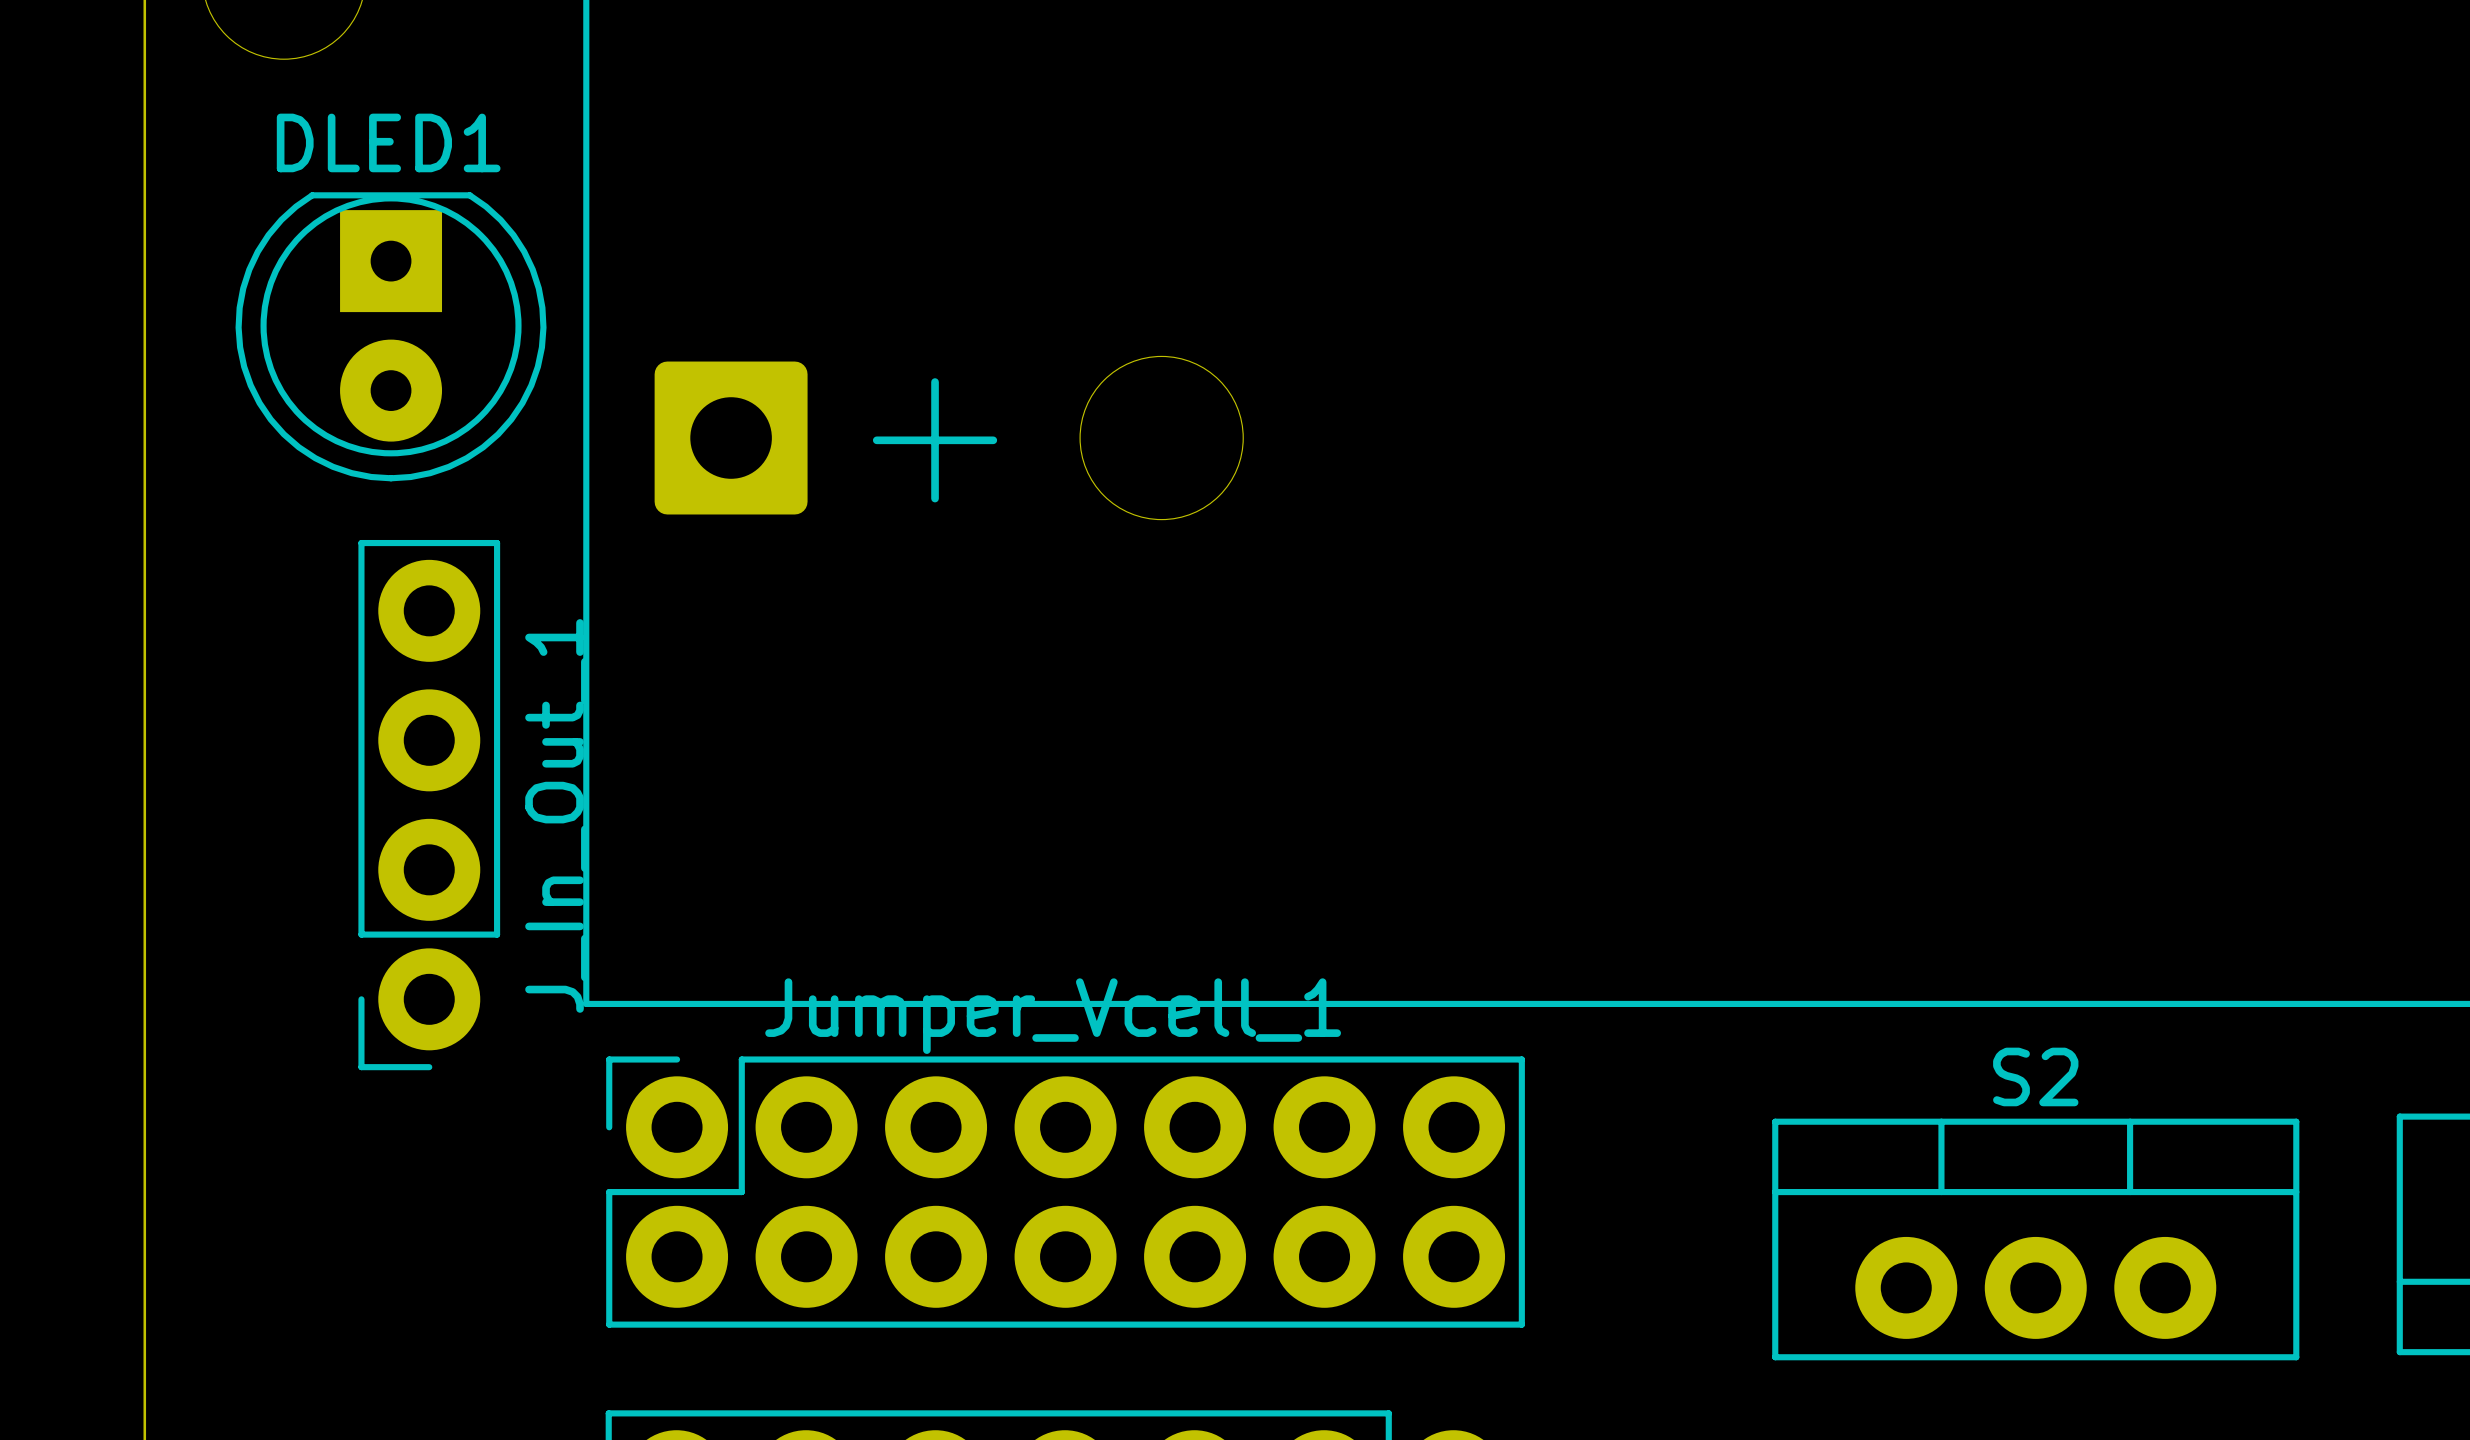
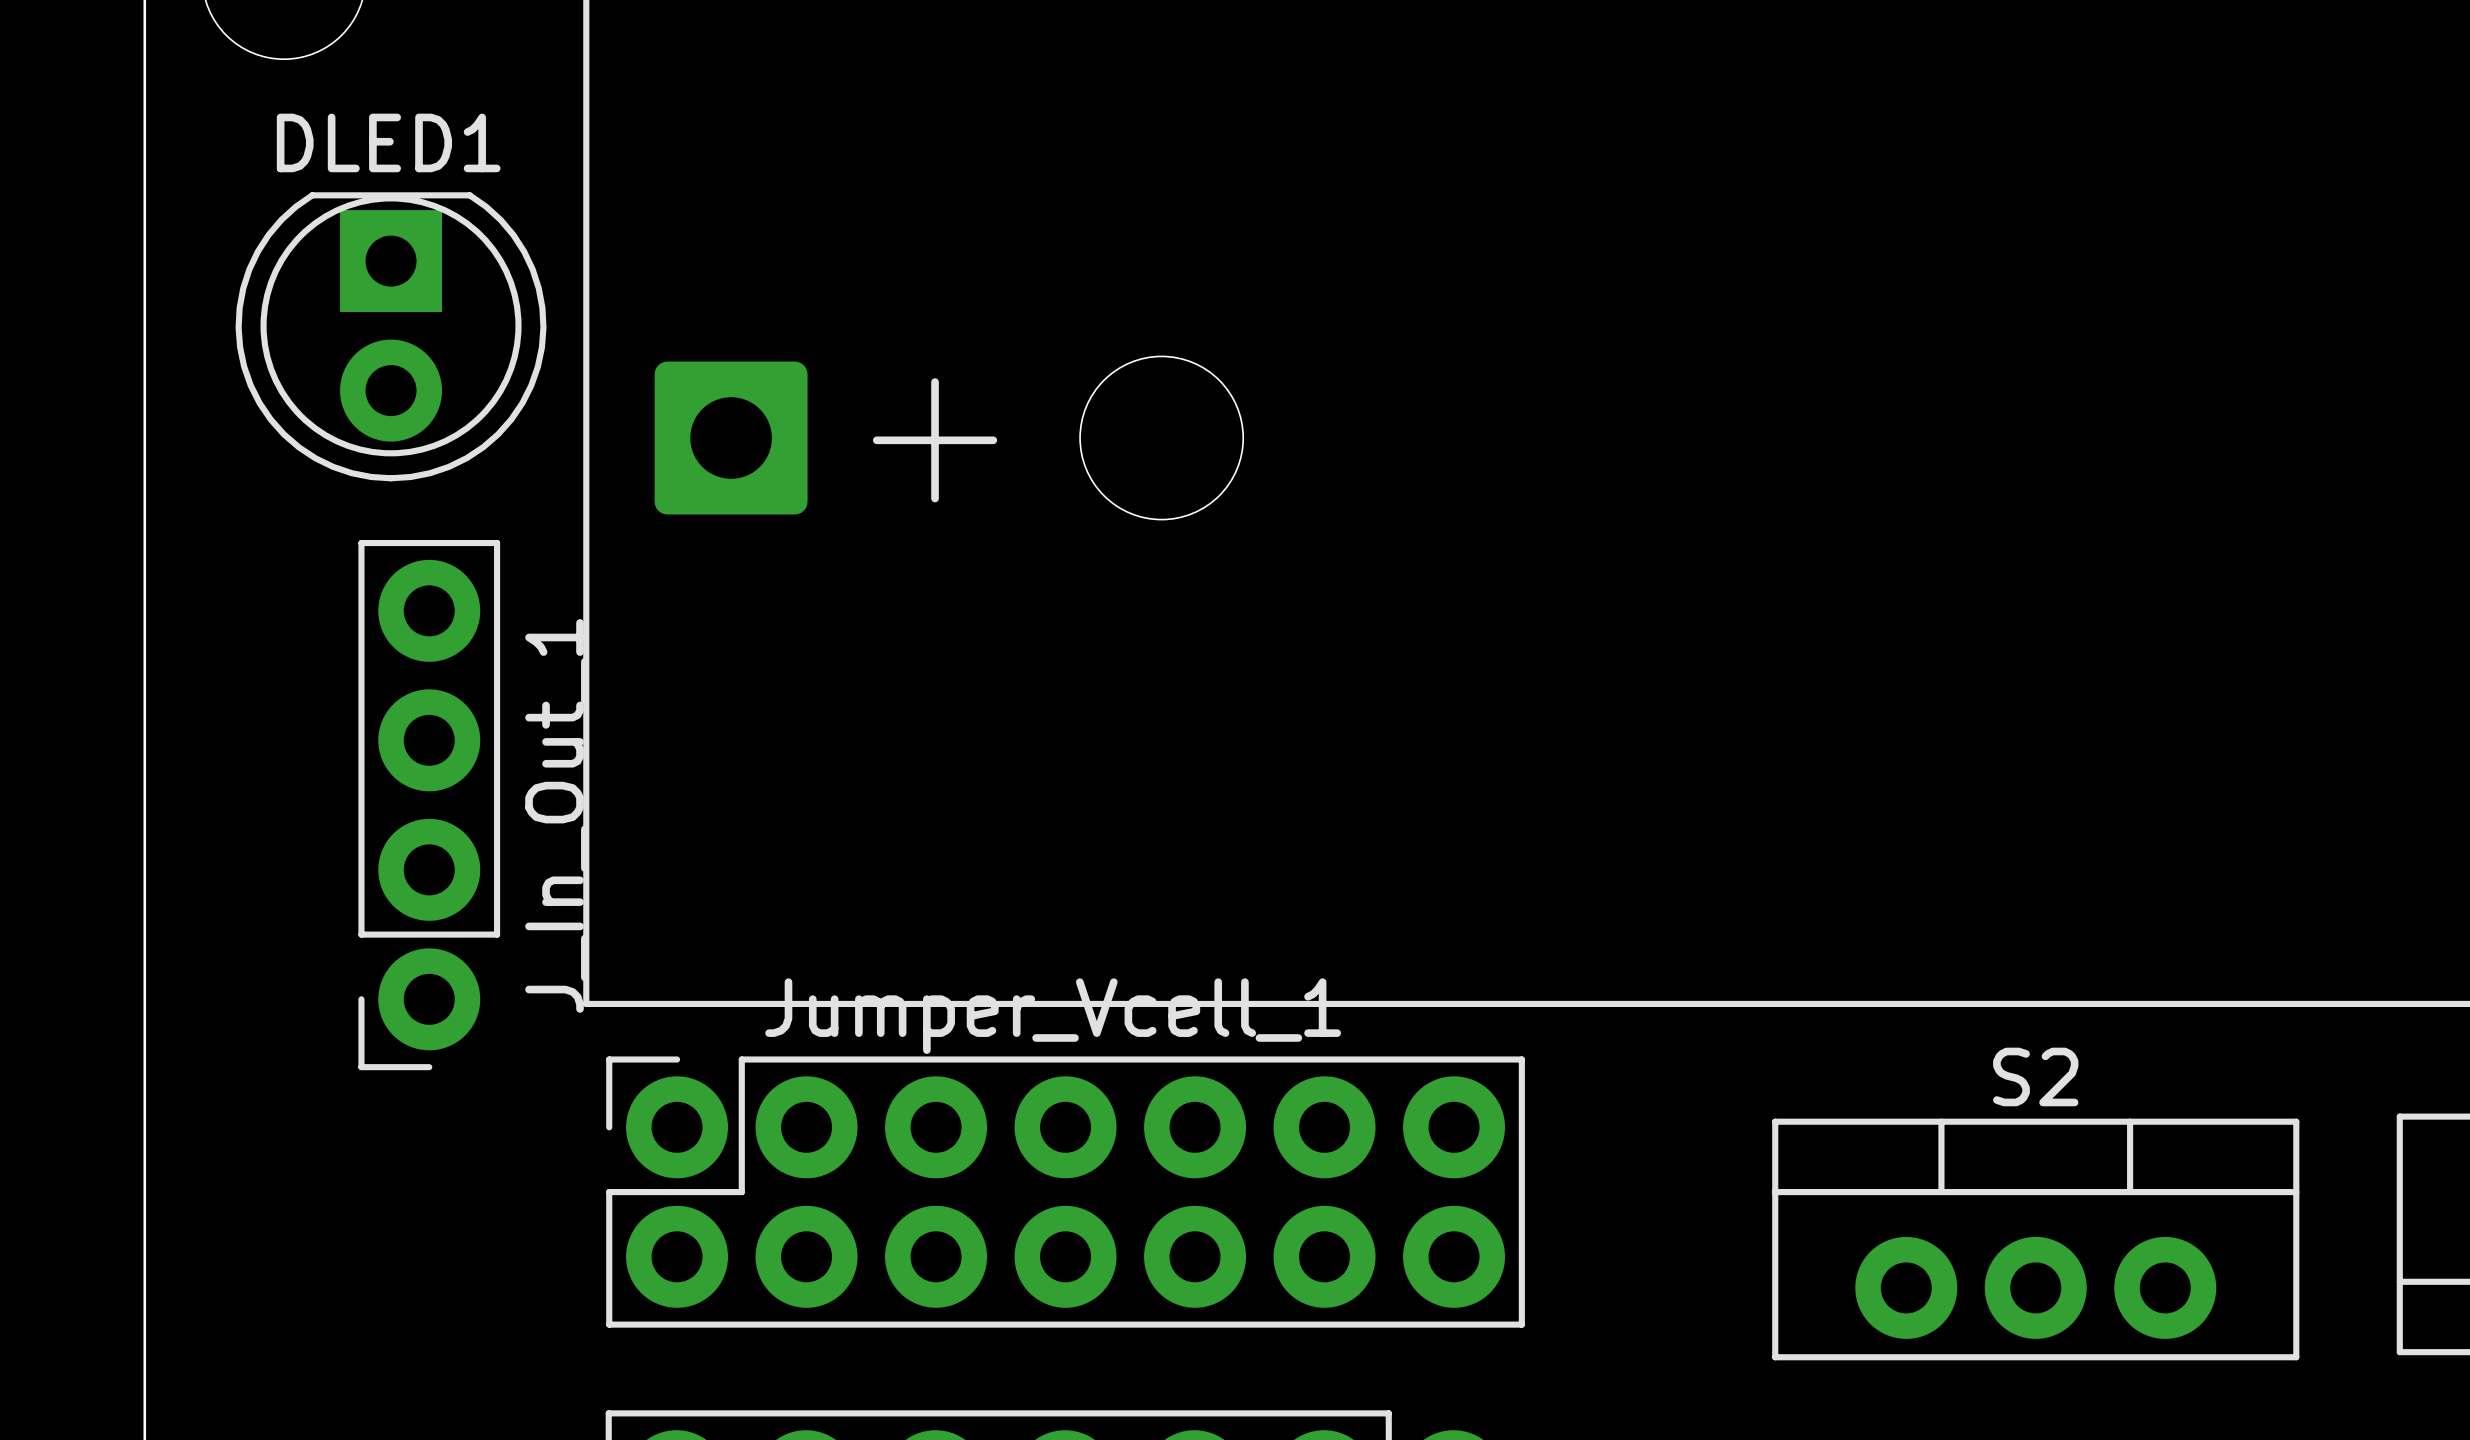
DLED1 footprint: [235, 192, 547, 482] -> [235, 192, 547, 482]

